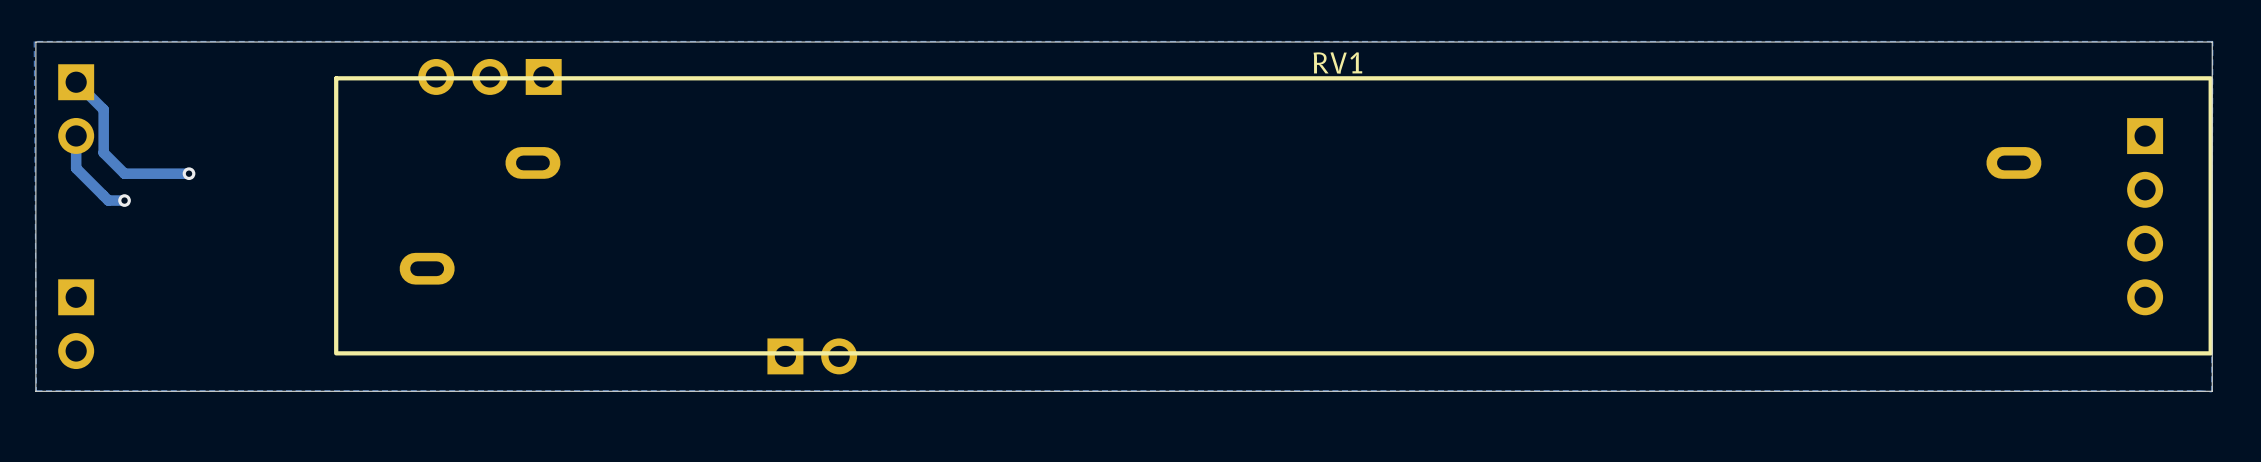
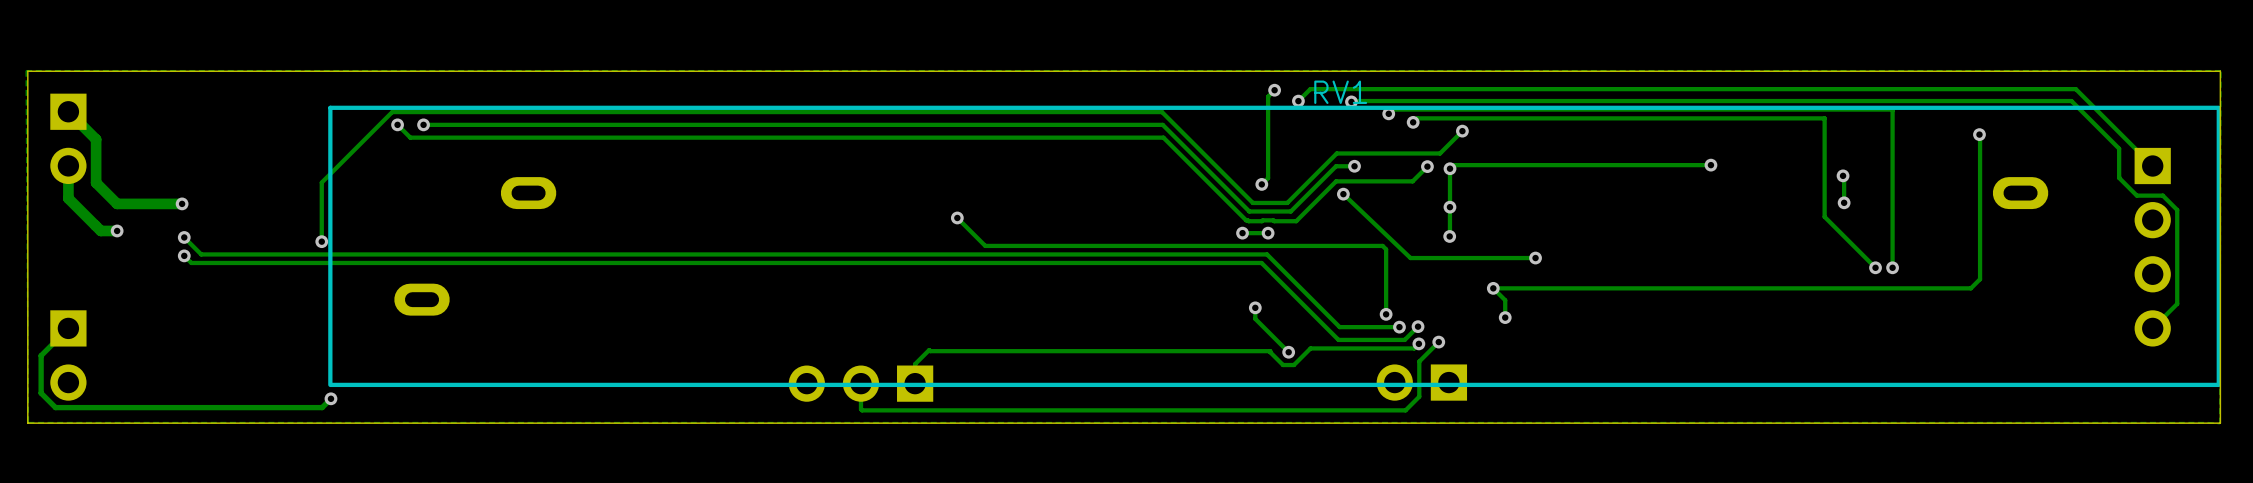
track: none -> (1274, 90) (1268, 96) (1268, 178) (1261, 184)
via: none -> (1274, 90)
track: none -> (1298, 101) (1310, 89) (2075, 89) (2152, 166)
via: none -> (1298, 101)
track: none -> (1351, 101) (2071, 101) (2119, 148) (2119, 177) (2136, 195) (2162, 195) (2177, 209) (2177, 303) (2152, 328)
via: none -> (1351, 101)
part position: (489, 76) -> (860, 383)
track: none -> (1388, 113) (1393, 109) (1891, 109) (1892, 267)
via: none -> (1388, 113)
track: none -> (1413, 122) (1417, 118) (1824, 118) (1824, 216) (1875, 267)
via: none -> (1413, 122)
track: none -> (397, 124) (410, 137) (1163, 137) (1248, 221) (1296, 221) (1336, 181) (1412, 181) (1427, 166)
via: none -> (397, 124)
track: none -> (423, 124) (1162, 124) (1249, 211) (1290, 211) (1336, 166) (1354, 166)
via: none -> (423, 124)
track: none -> (1462, 131) (1440, 153) (1336, 153) (1287, 202) (1252, 202) (1162, 112) (392, 112) (321, 182) (321, 241)
via: none -> (1462, 131)
track: none -> (1979, 134) (1980, 279) (1970, 288) (1493, 288) (1505, 300) (1505, 317)
via: none -> (1979, 134)
track: none -> (1710, 165) (1453, 165) (1450, 168) (1449, 236)
via: none -> (1710, 165)
via: none -> (1354, 166)
via: none -> (1427, 166)
via: none -> (1450, 168)
track: none -> (1843, 175) (1844, 202)
via: none -> (1843, 175)
via: none -> (1261, 184)
track: none -> (1343, 194) (1410, 258) (1535, 258)
via: none -> (1343, 194)
via: none -> (1844, 202)
via: none -> (1449, 207)
track: none -> (957, 217) (985, 245) (1382, 245) (1386, 249) (1386, 314)
via: none -> (957, 217)
via: none -> (1242, 233)
track: none -> (1268, 233) (1242, 233)
via: none -> (1268, 233)
via: none -> (1449, 236)
track: none -> (184, 237) (201, 254) (1267, 254) (1339, 327) (1399, 327)
via: none -> (184, 237)
via: none -> (321, 241)
track: none -> (184, 255) (191, 262) (1261, 262) (1338, 339) (1404, 339) (1418, 326)
via: none -> (184, 255)
via: none -> (1535, 258)
via: none -> (1875, 267)
via: none -> (1892, 267)
via: none -> (1493, 288)
track: none -> (1255, 307) (1255, 318) (1288, 352)
via: none -> (1255, 307)
via: none -> (1386, 314)
via: none -> (1505, 317)
via: none -> (1418, 326)
via: none -> (1399, 327)
track: none -> (68, 328) (41, 355) (41, 393) (55, 407) (322, 407) (330, 398)
track: none -> (1438, 342) (1419, 361) (1419, 396) (1405, 410) (862, 410) (860, 383)
via: none -> (1438, 342)
track: none -> (1418, 343) (1414, 348) (1310, 348) (1293, 365) (1283, 365) (1270, 351) (929, 350) (915, 364) (915, 383)
via: none -> (1418, 343)
via: none -> (1288, 352)
part: none -> (1421, 382)
part: (812, 356) -> none
via: none -> (330, 398)

